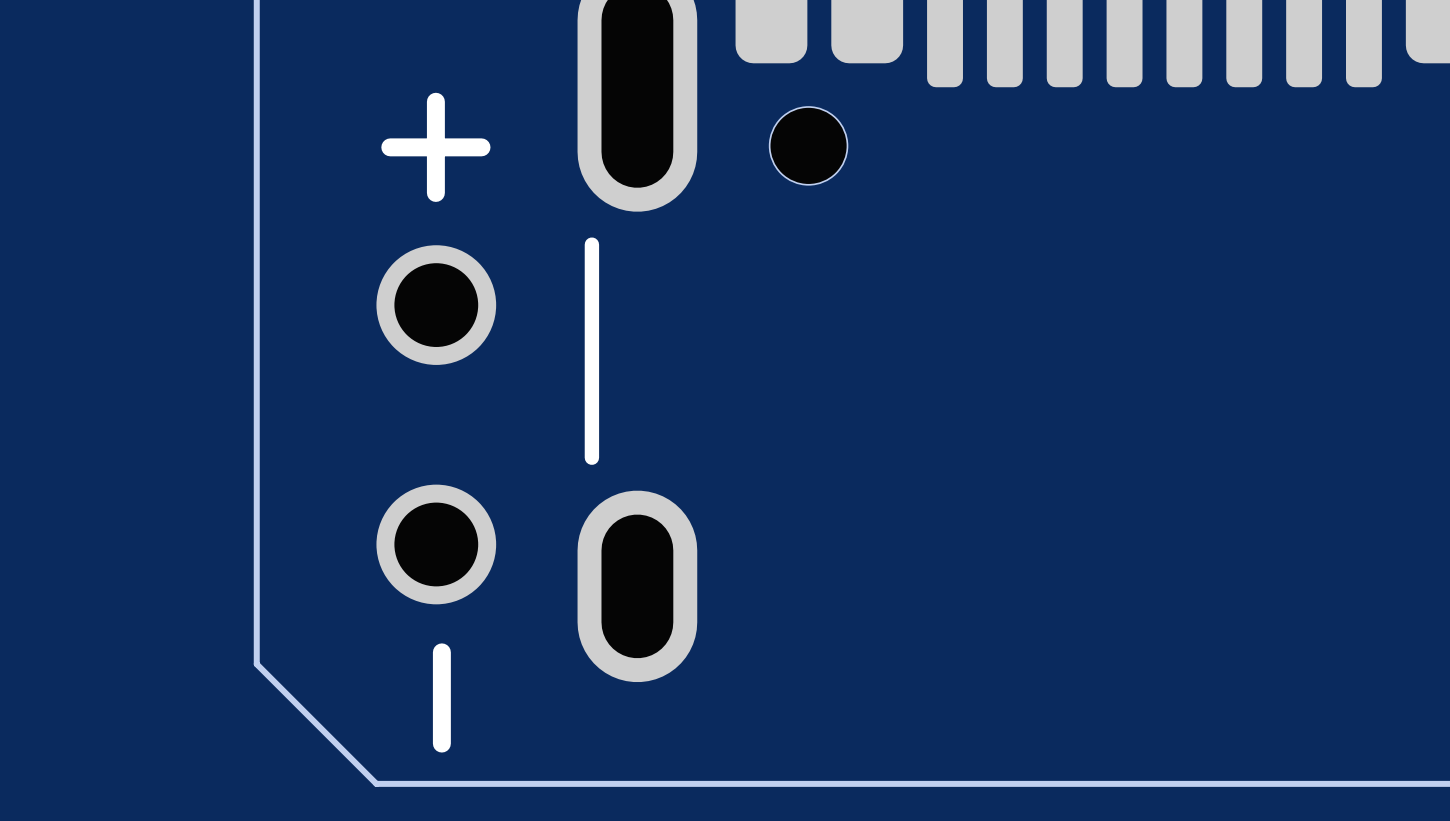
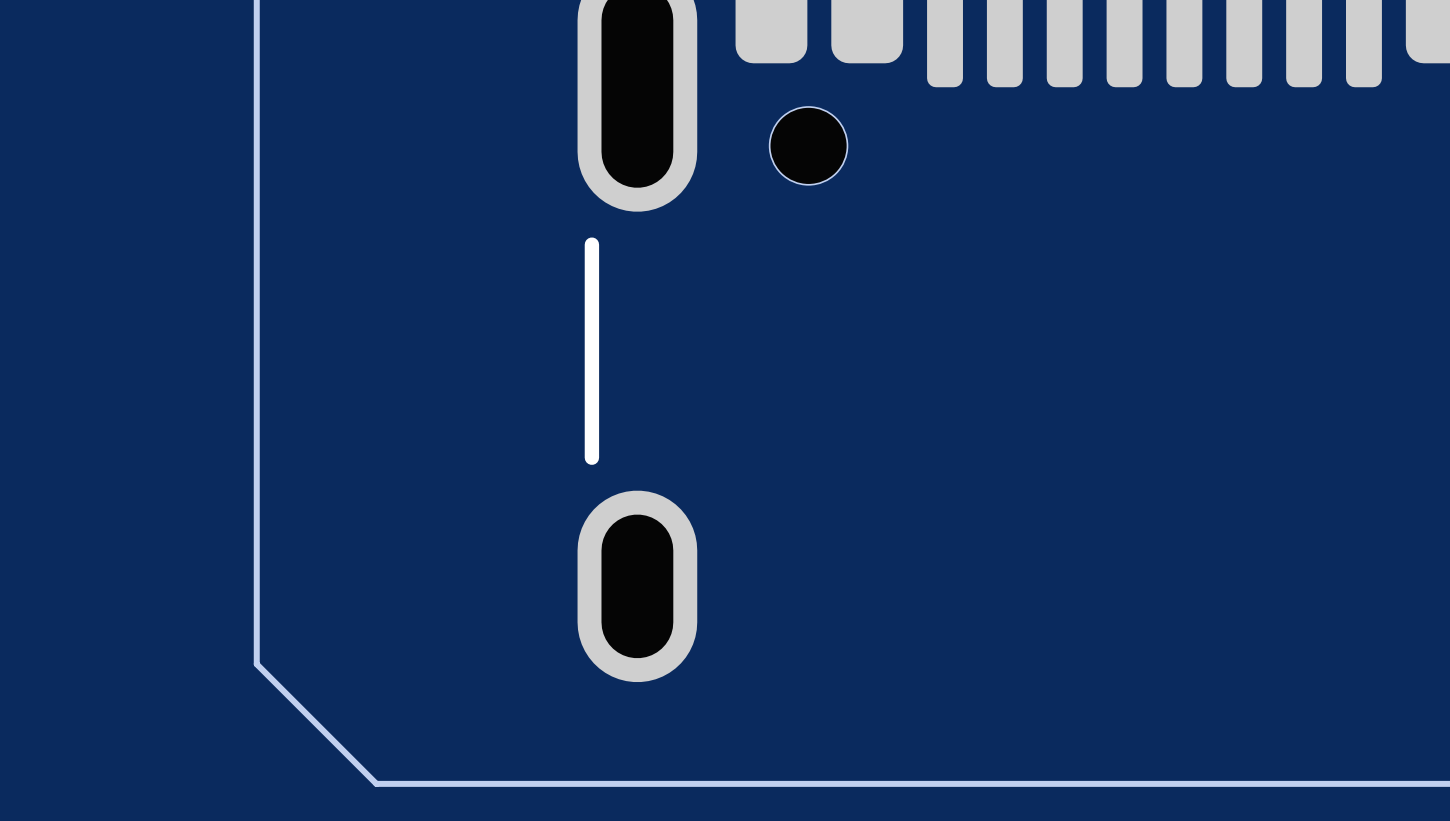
text: + (435, 147) -> none
part: (436, 305) -> none
part: (436, 544) -> none
text: - (441, 697) -> none

